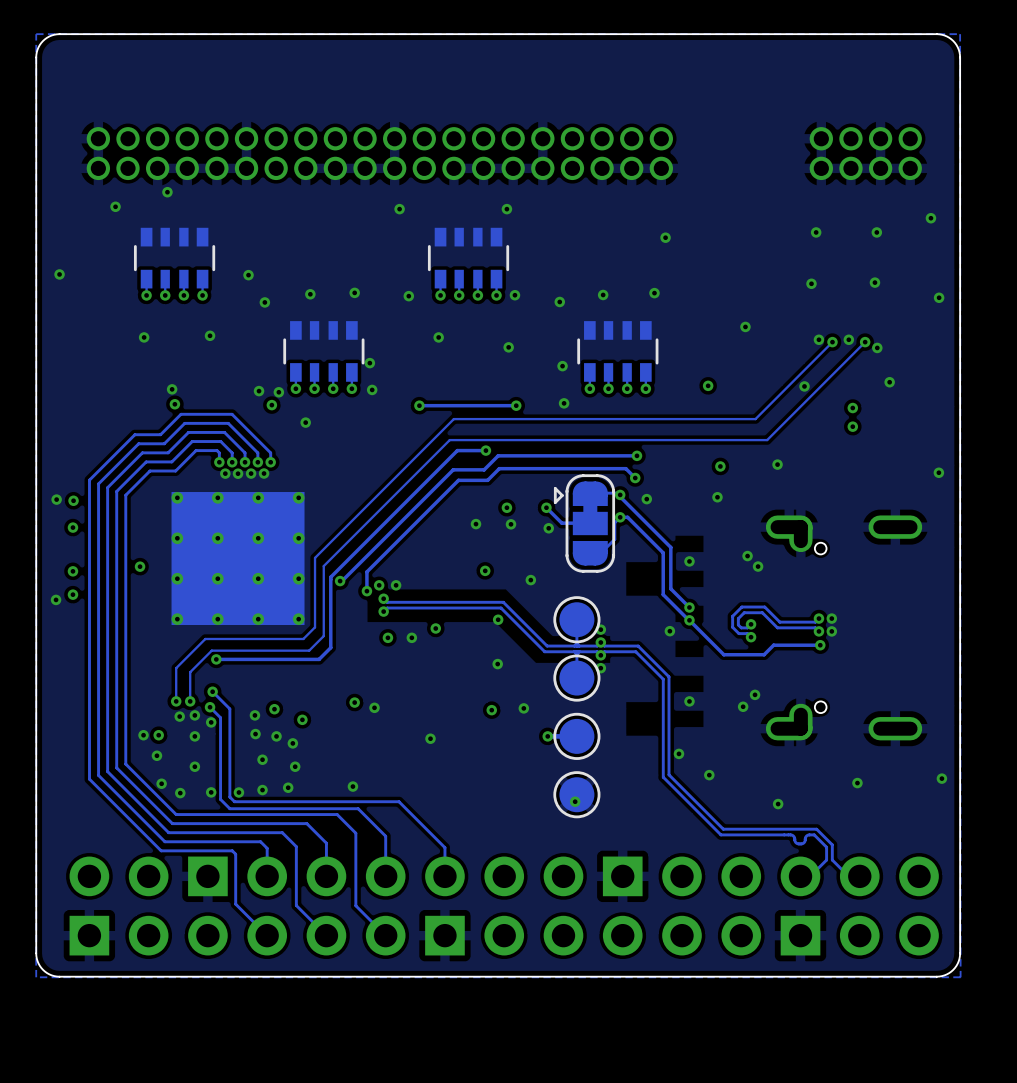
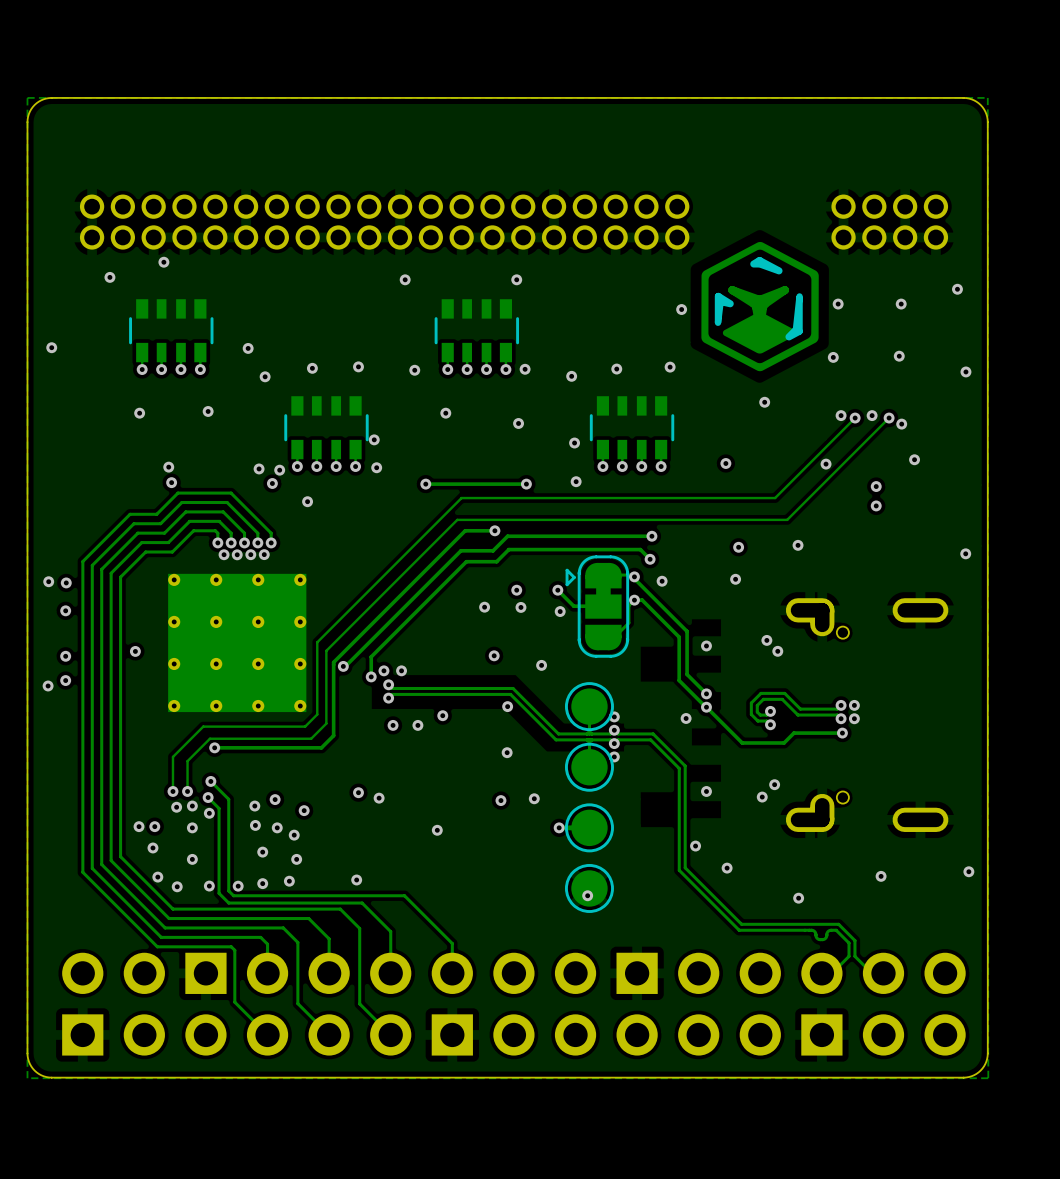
drawing: none -> [701, 241, 819, 372]

